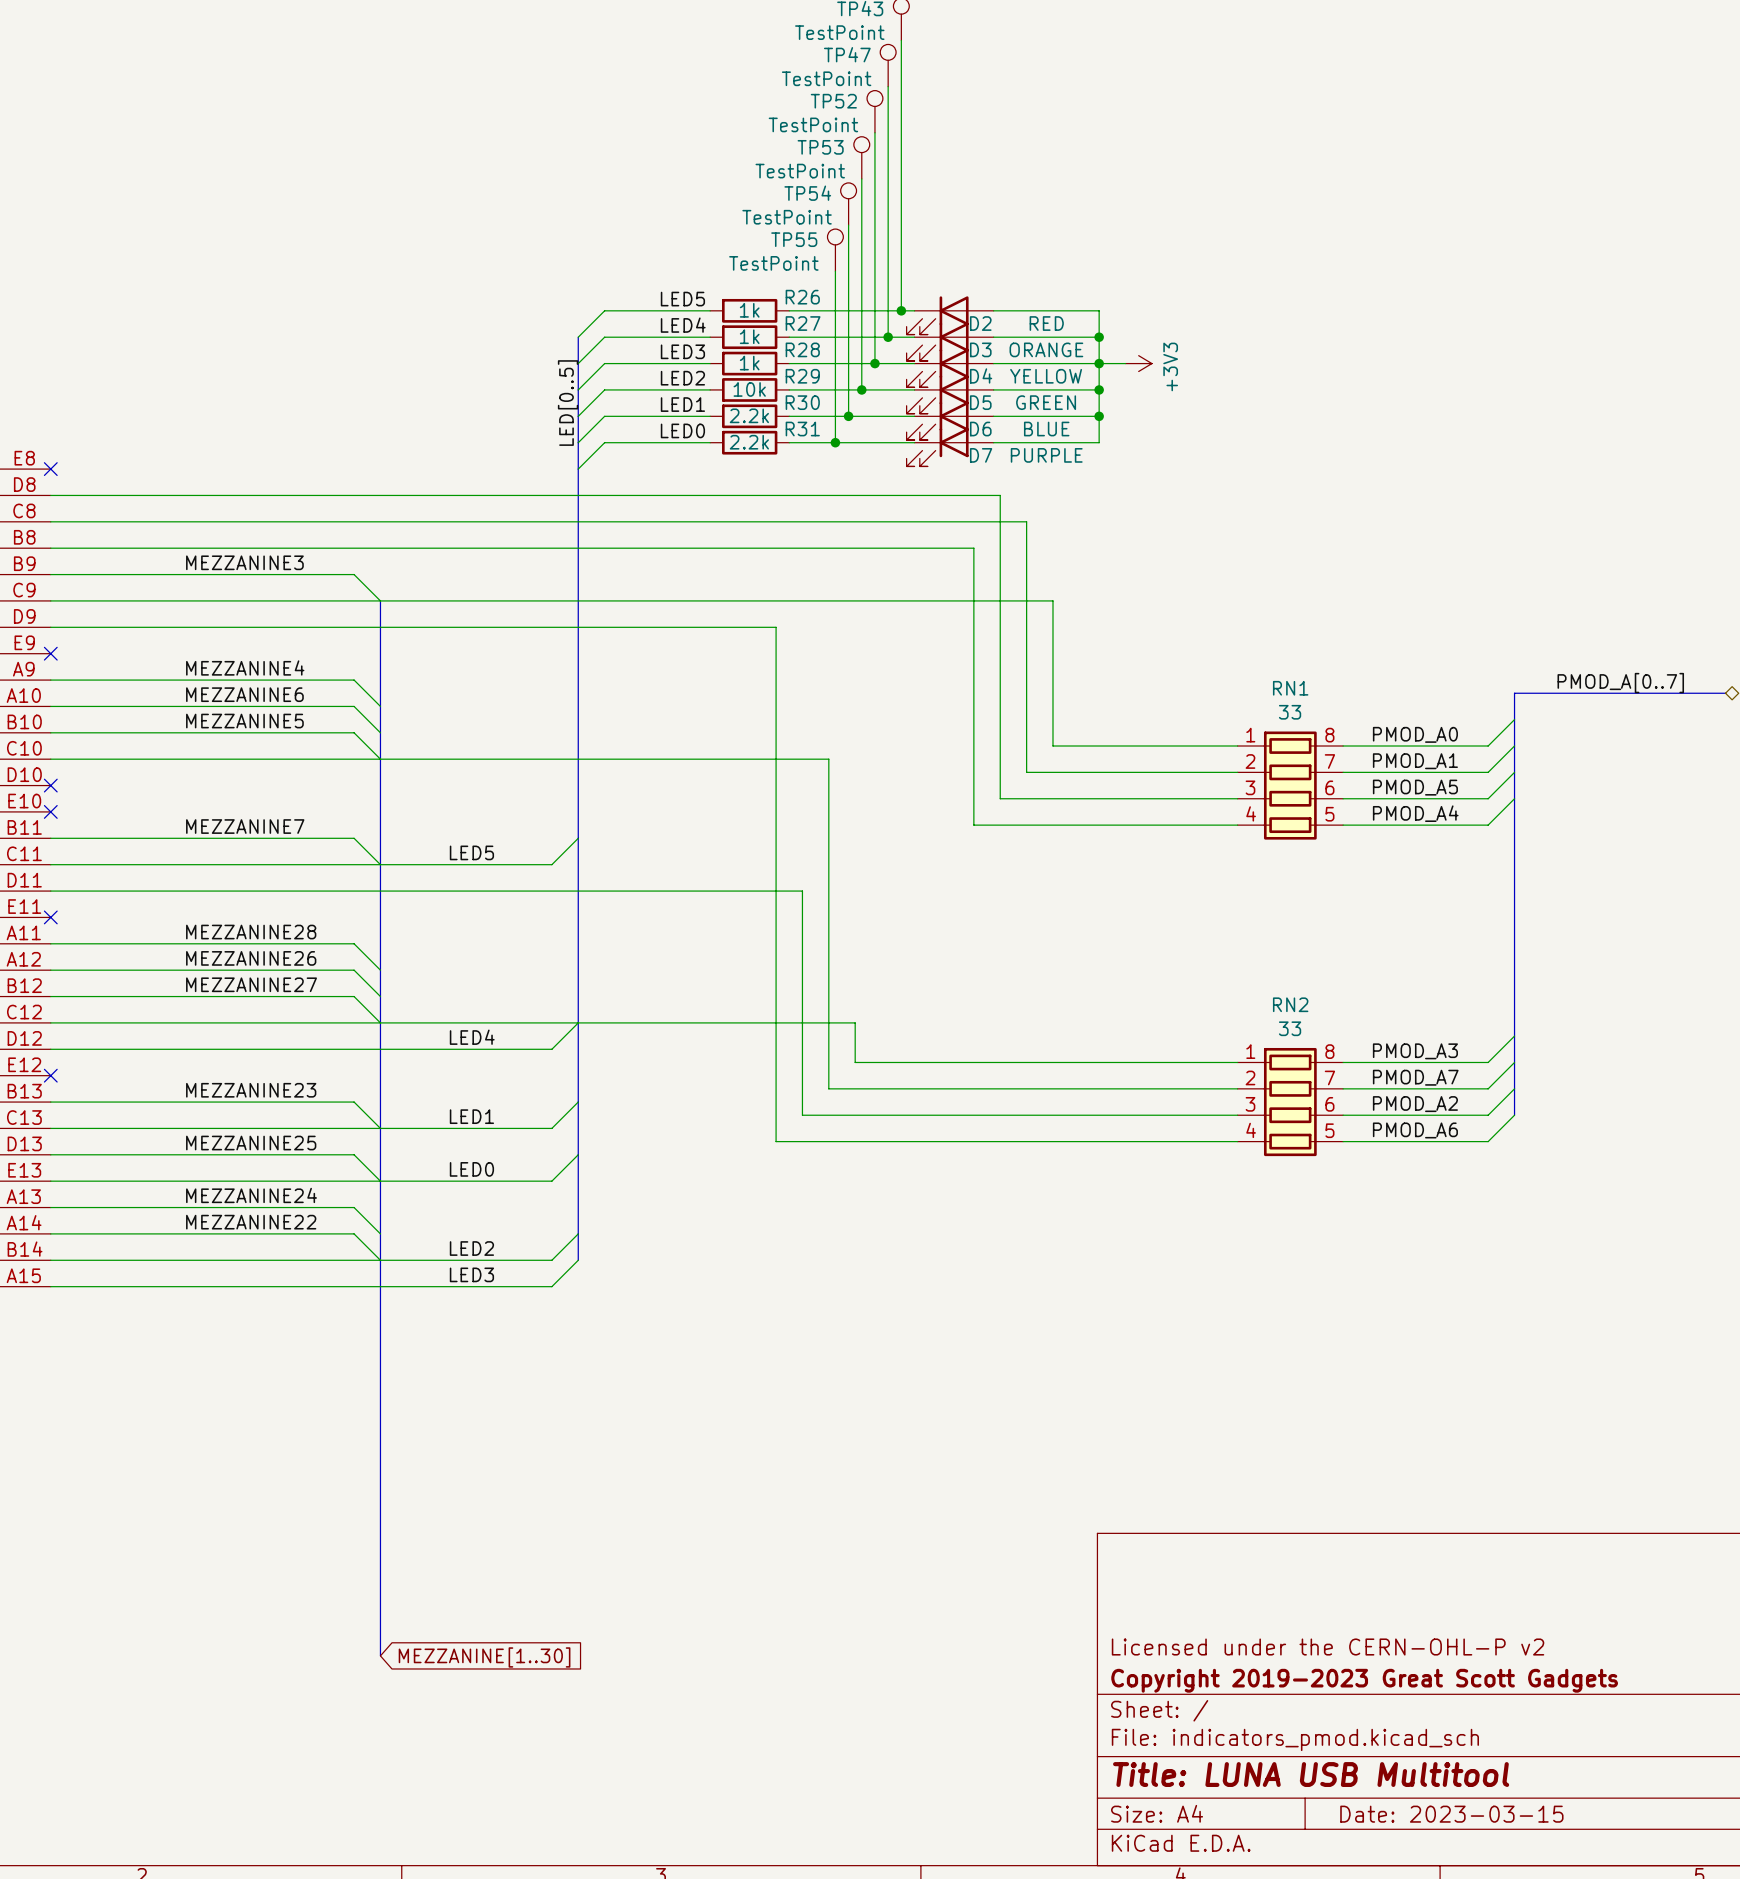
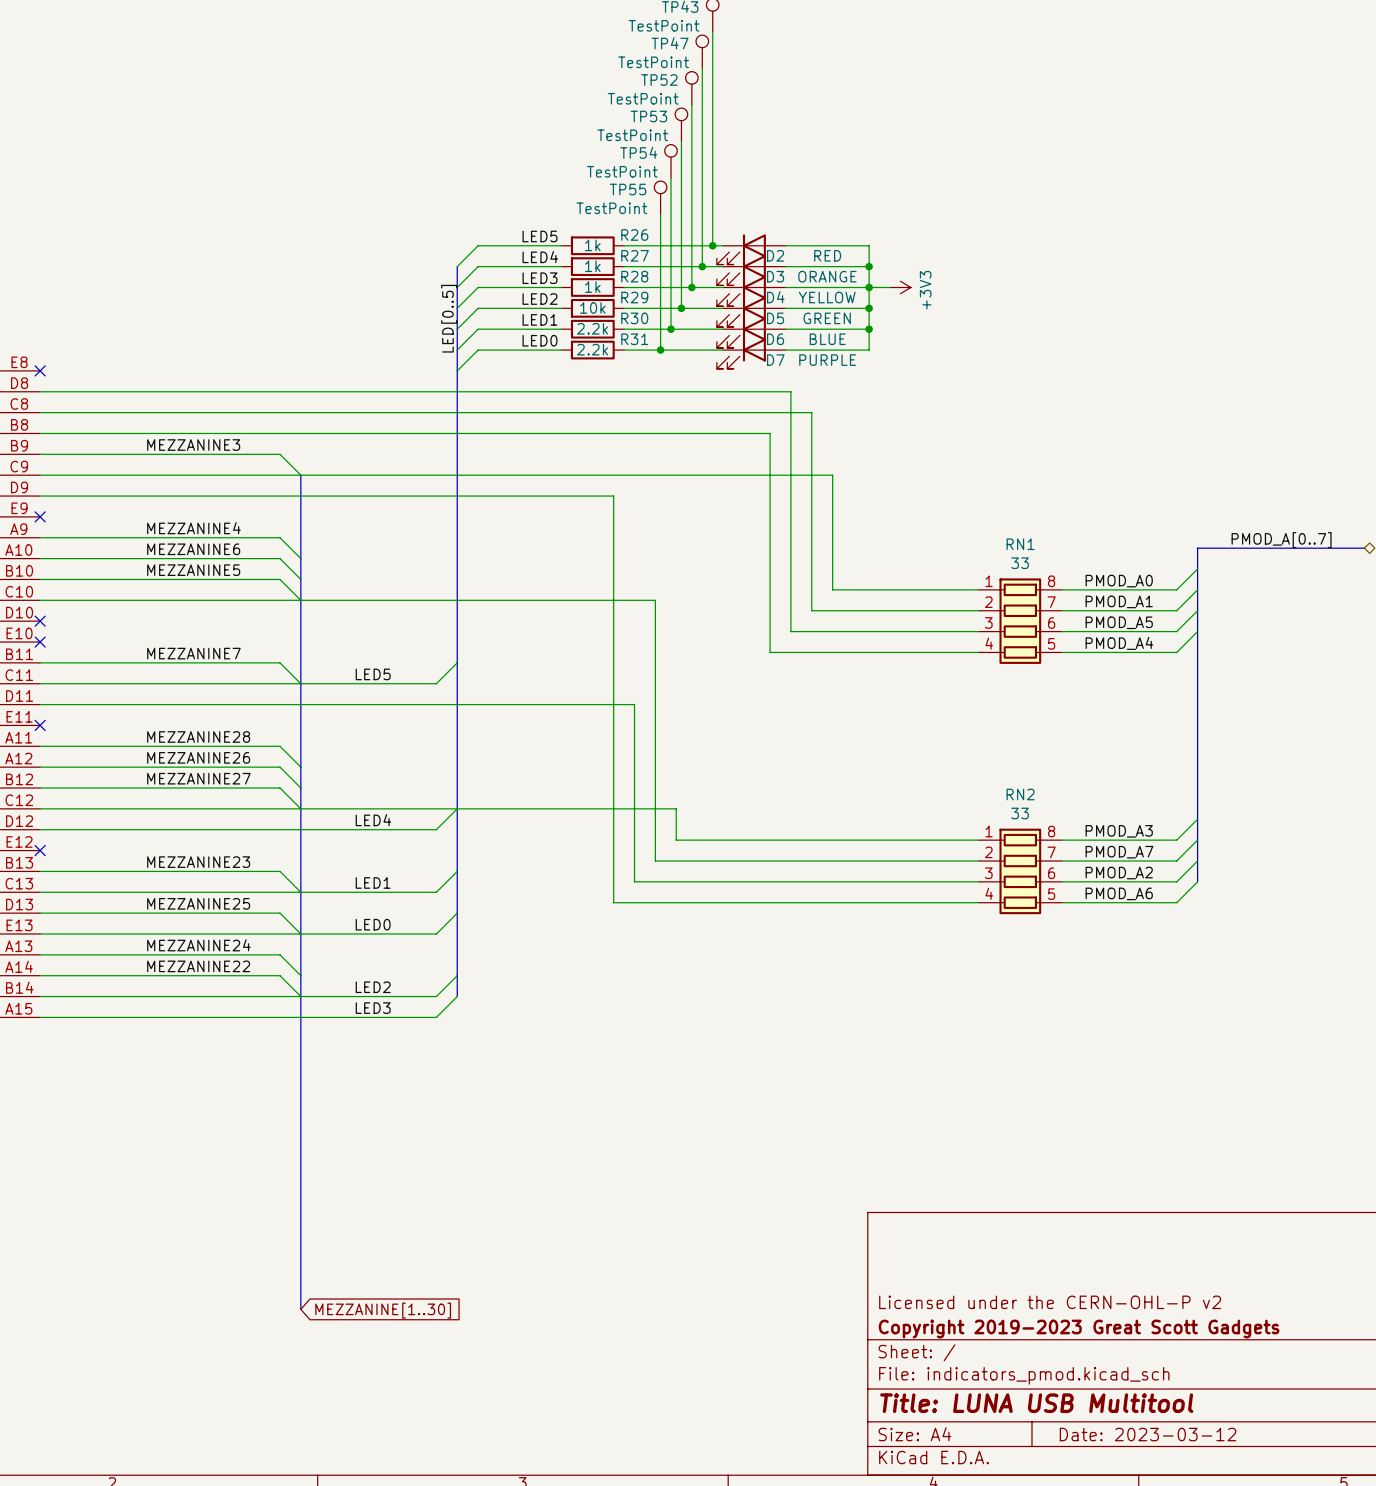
title block: Date: 2023-03-15 (1451, 1814) -> Date: 2023-03-12 (1148, 1434)

